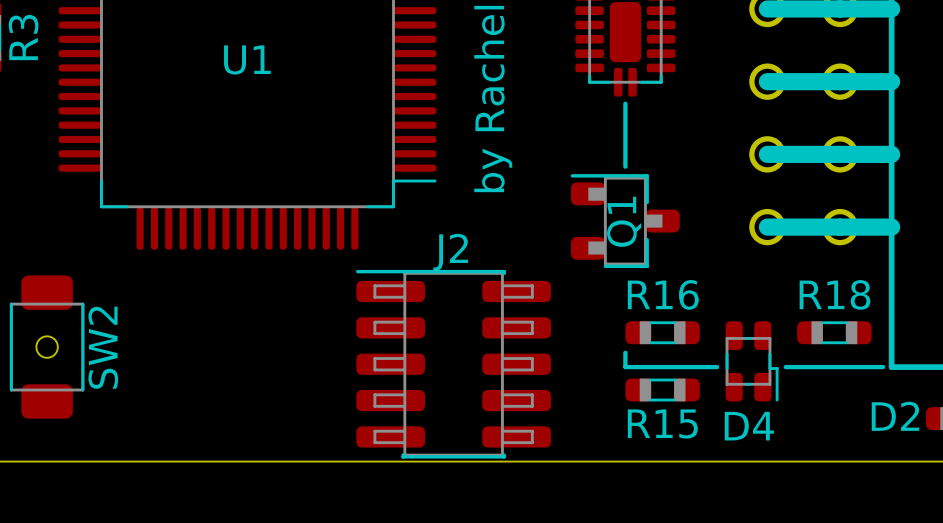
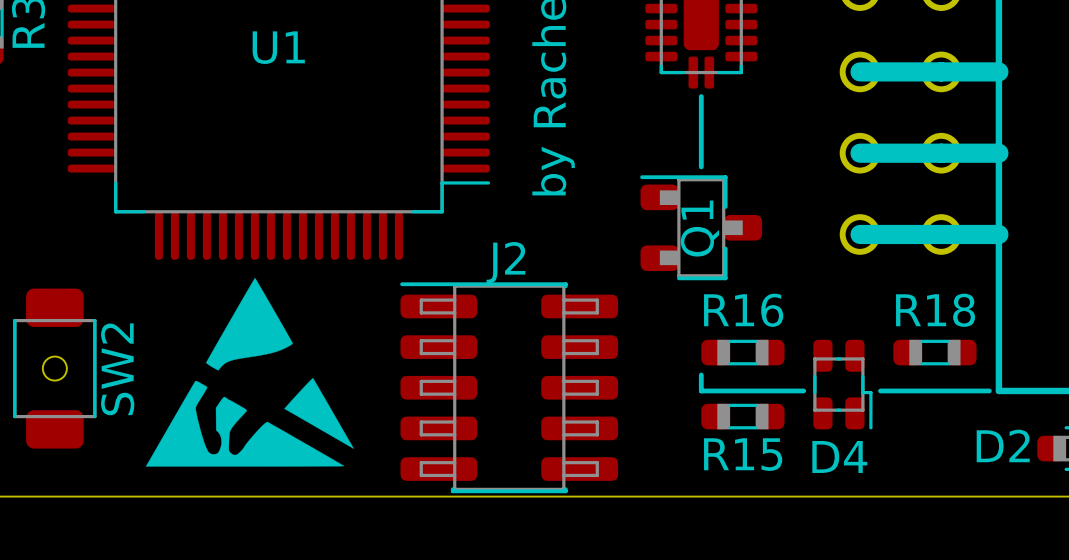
drawing: none -> [145, 277, 354, 467]

